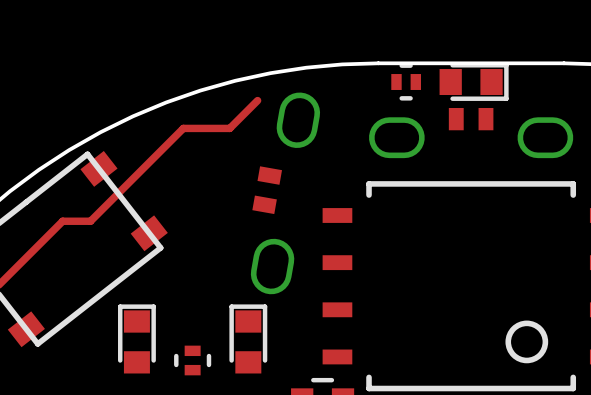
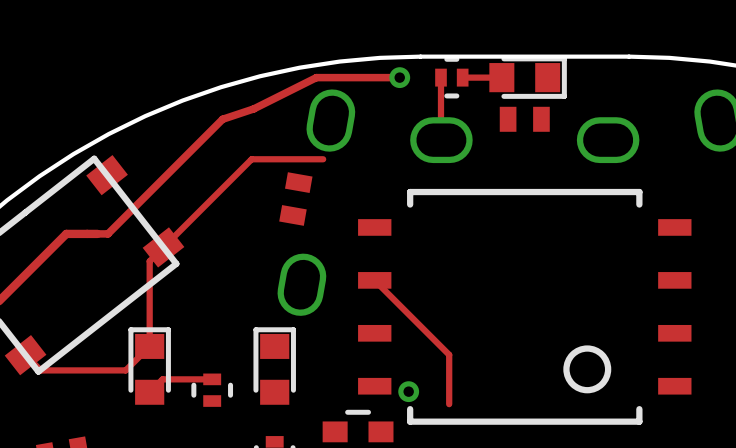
via: none -> (399, 77)
top track: none -> (441, 77) (441, 139)
top track: none -> (462, 77) (501, 77)
top track: (257, 100) (229, 128) (183, 128) (90, 221) -> (399, 77) (316, 77) (253, 108) (222, 119) (108, 233) (97, 233)
top track: none -> (323, 159) (251, 159) (149, 261) (149, 346) (125, 370) (40, 370) (25, 355)
top track: none -> (374, 280) (449, 354) (449, 404)
top track: none -> (212, 379) (162, 379) (149, 392)
via: none -> (408, 391)

